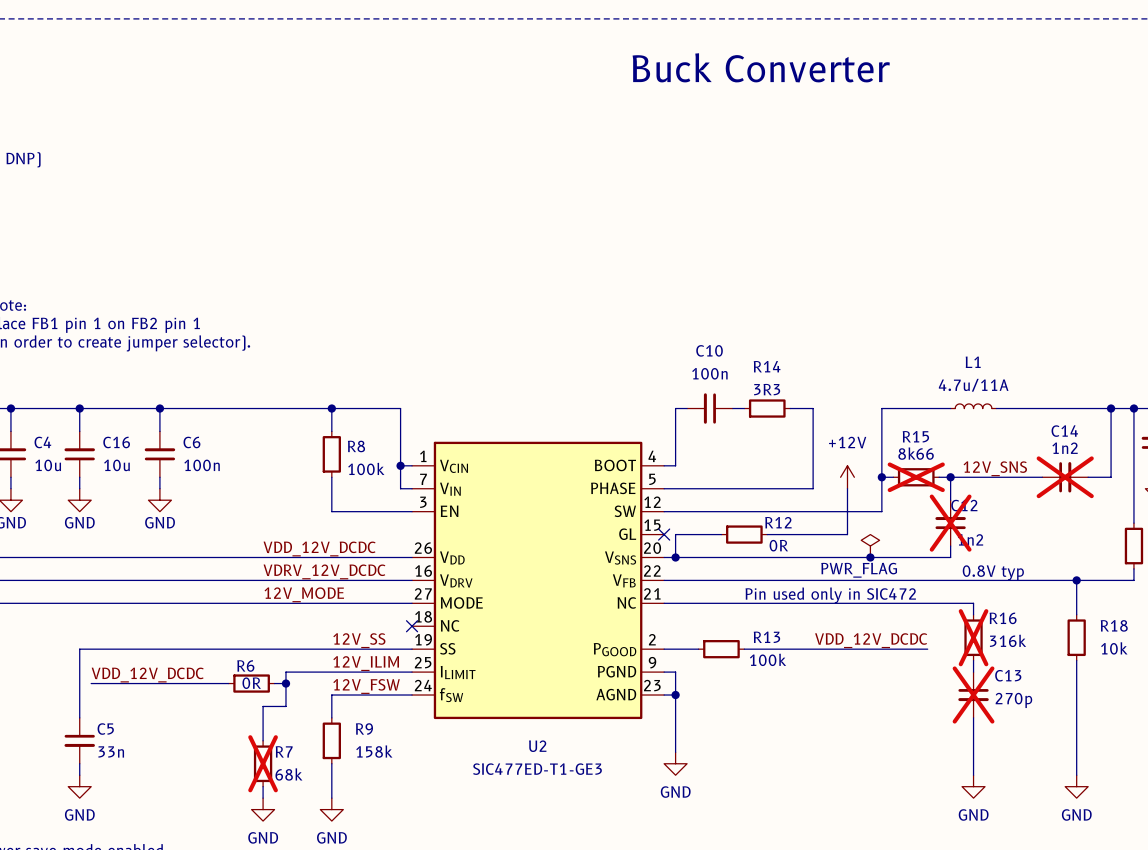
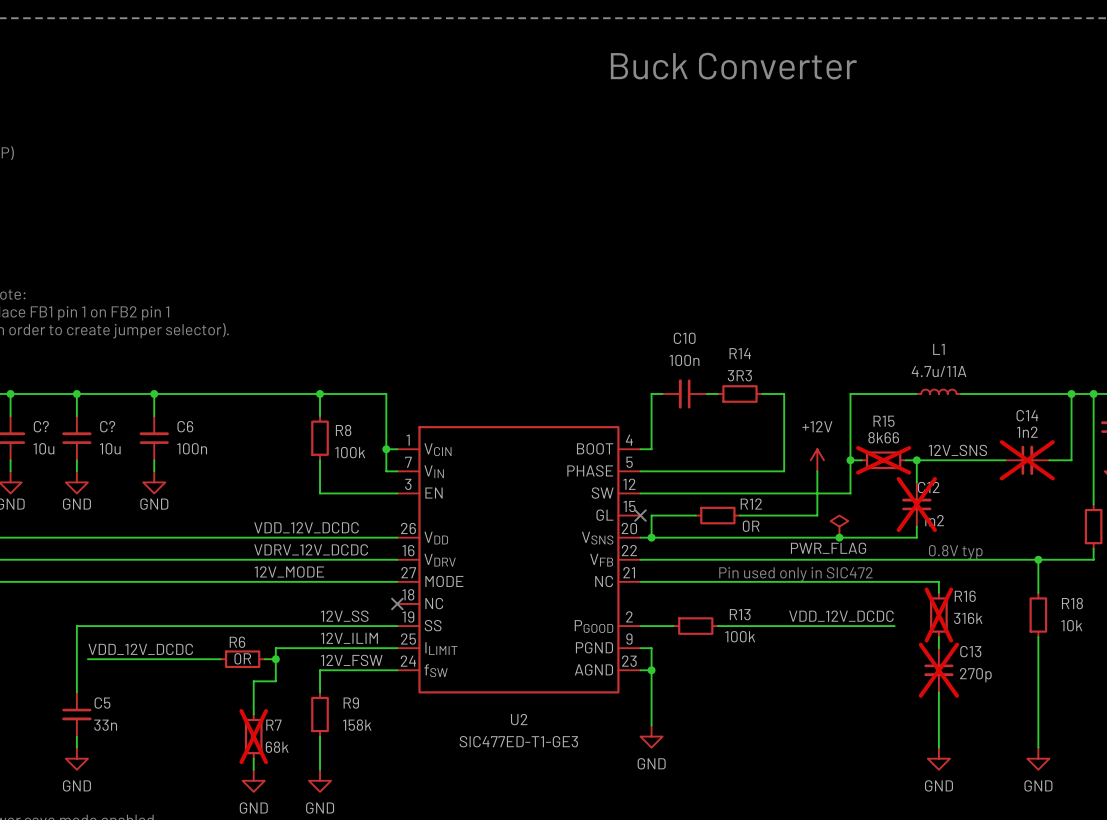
C4 name: C4 (42, 442) -> C? (41, 426)
C16 name: C16 (116, 442) -> C? (107, 426)

